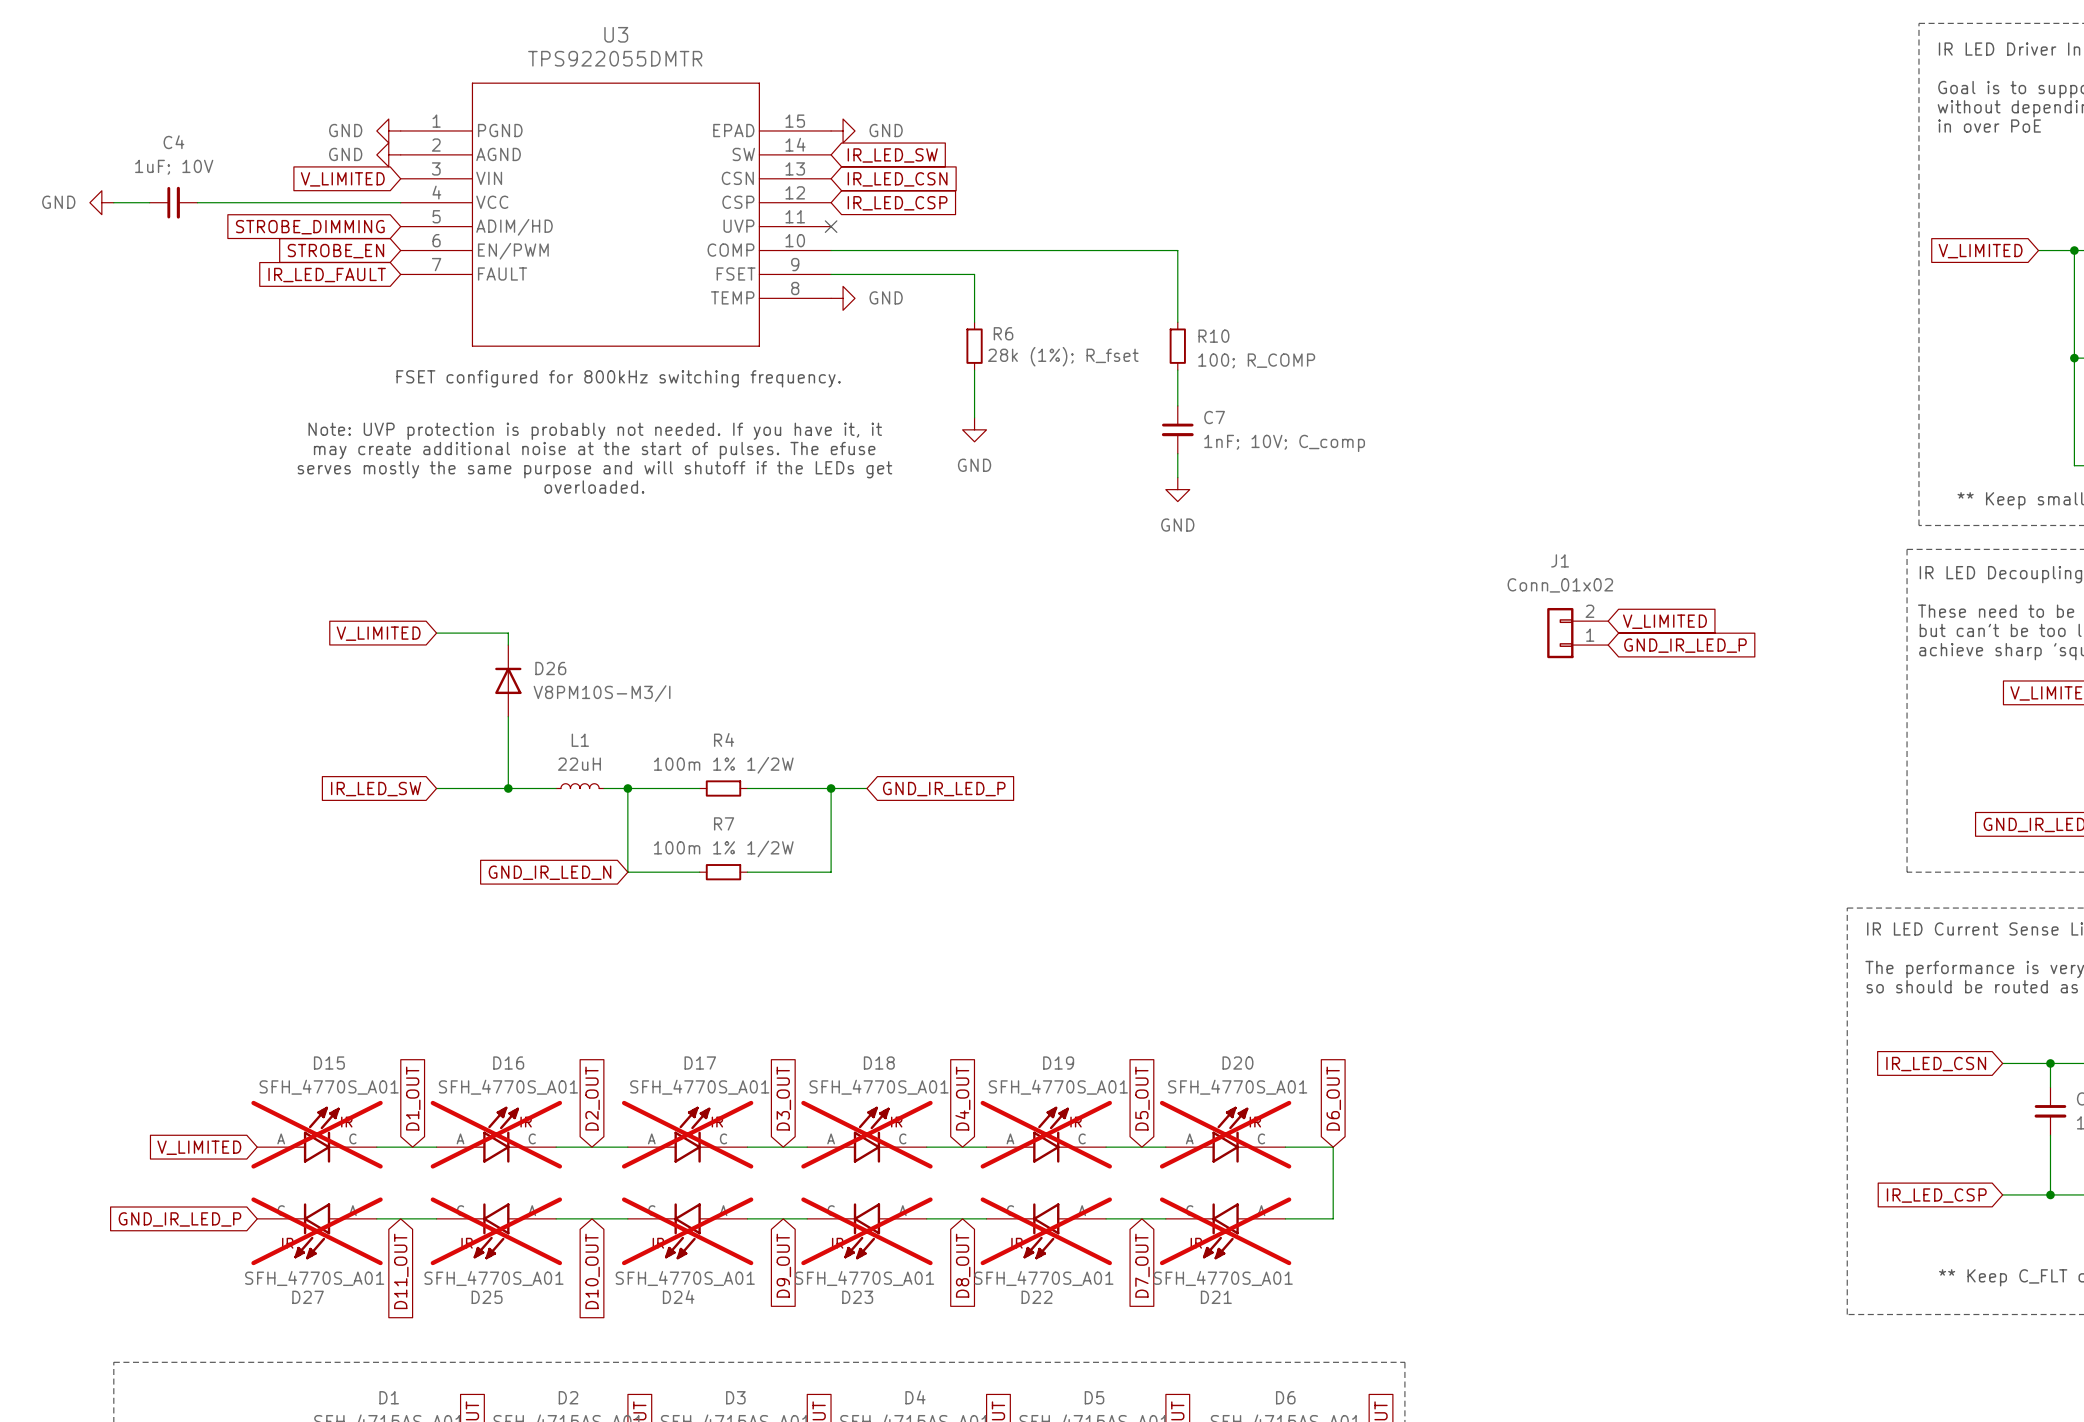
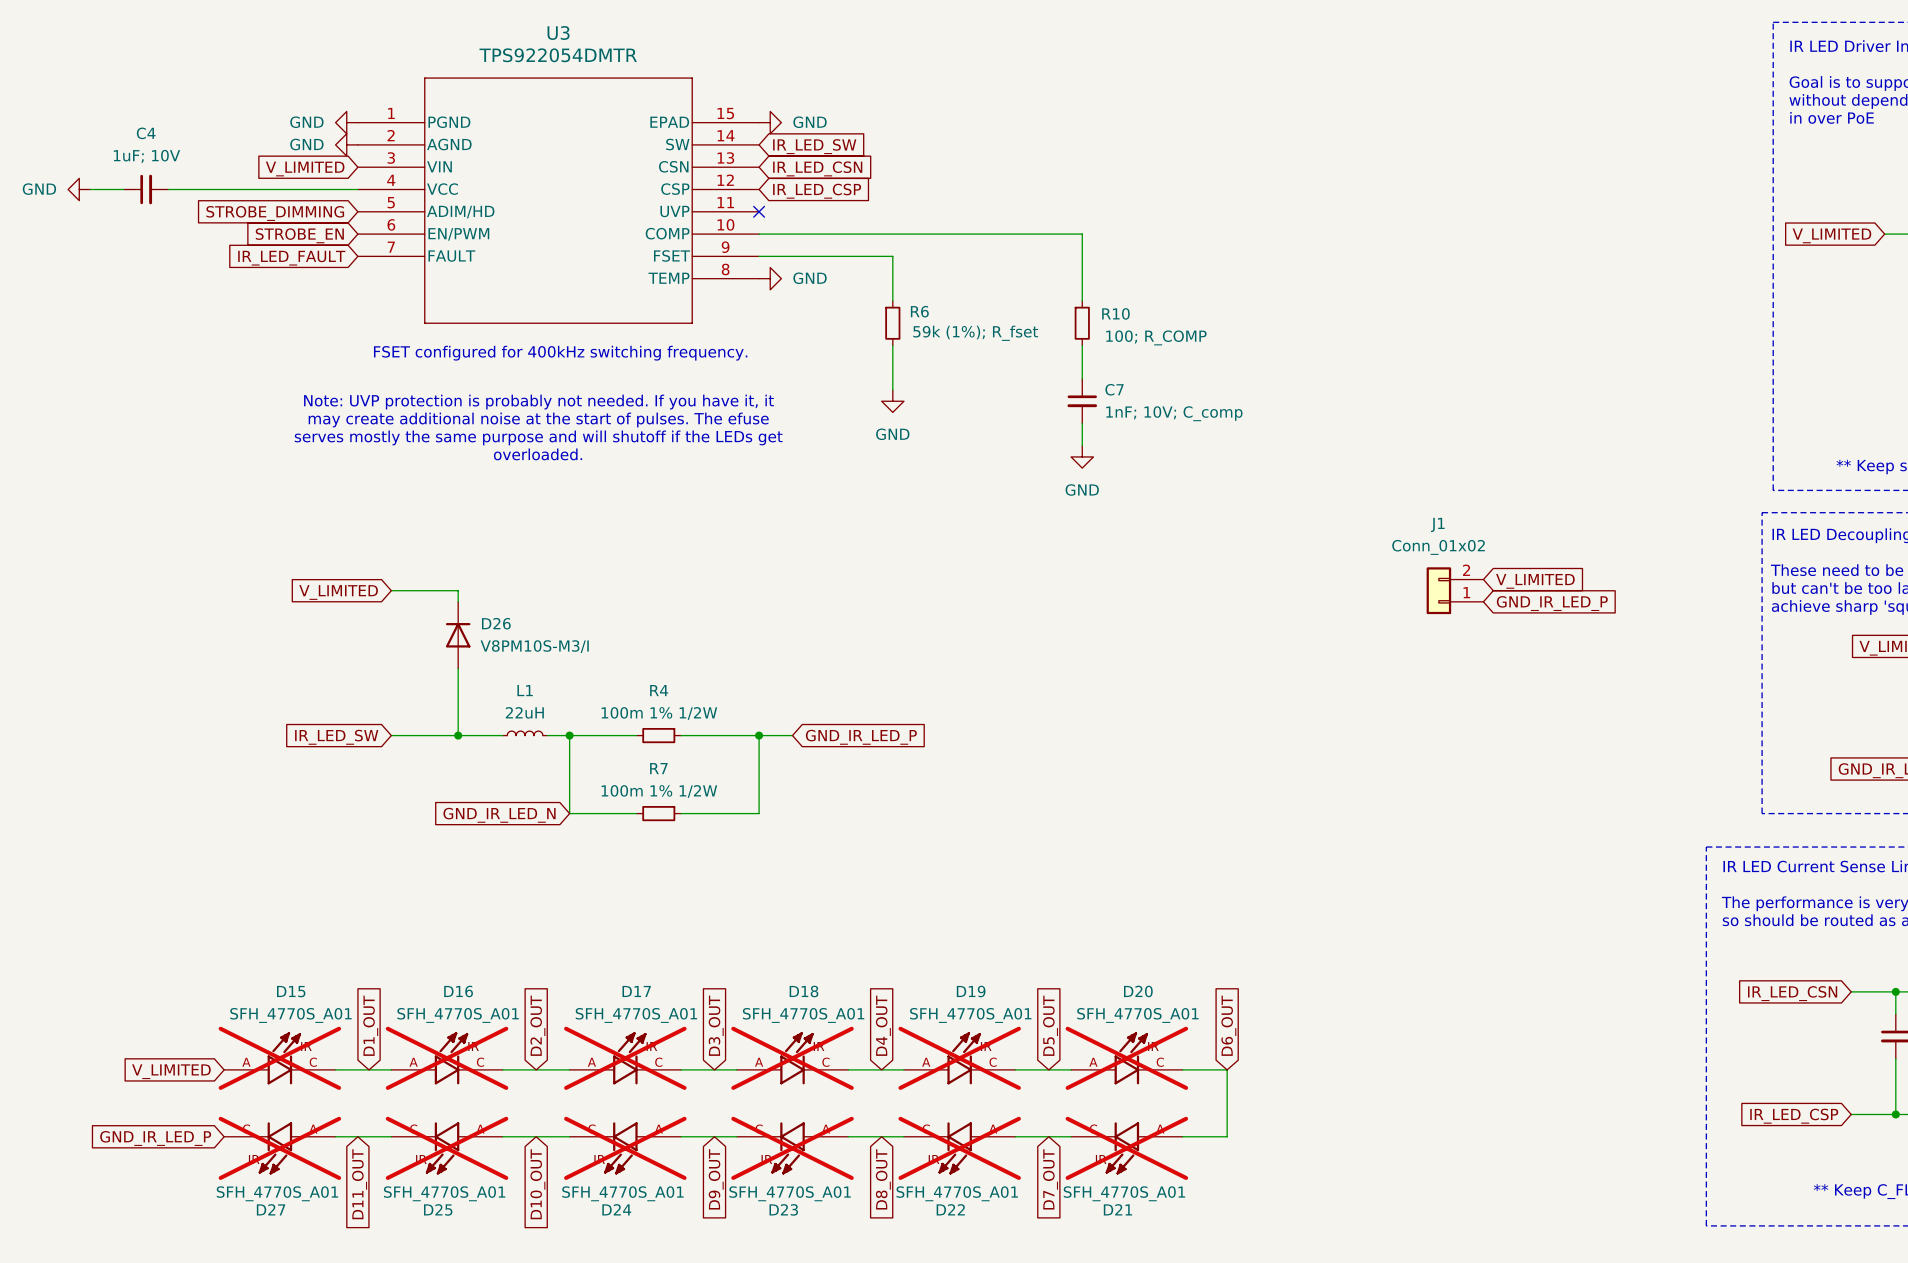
U3 value: TPS922055DMTR (615, 58) -> TPS922054DMTR (558, 55)
R6 value: 28k (1%); R_fset (1063, 356) -> 59k (1%); R_fset (975, 333)
text: FSET configured for 800kHz switching frequency. (618, 378) -> FSET configured for 400kHz switching frequency. (560, 353)

